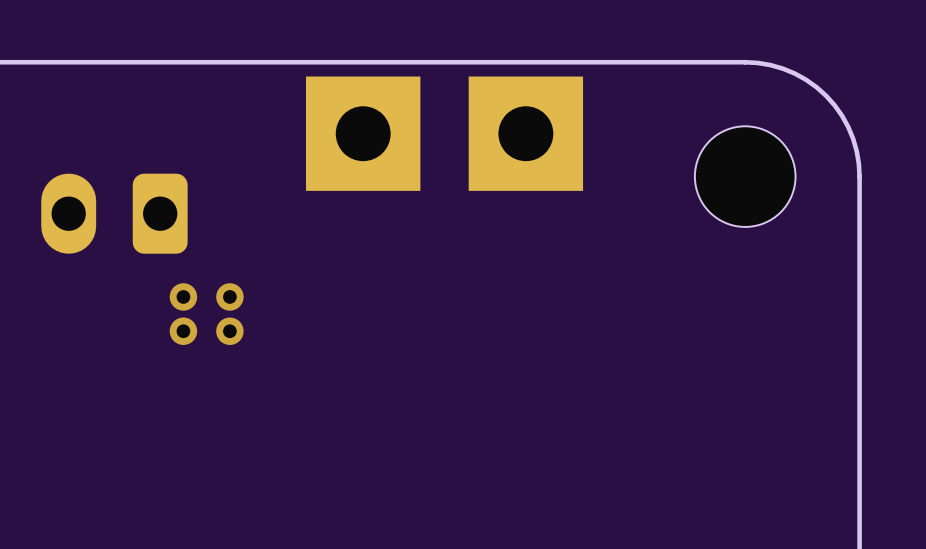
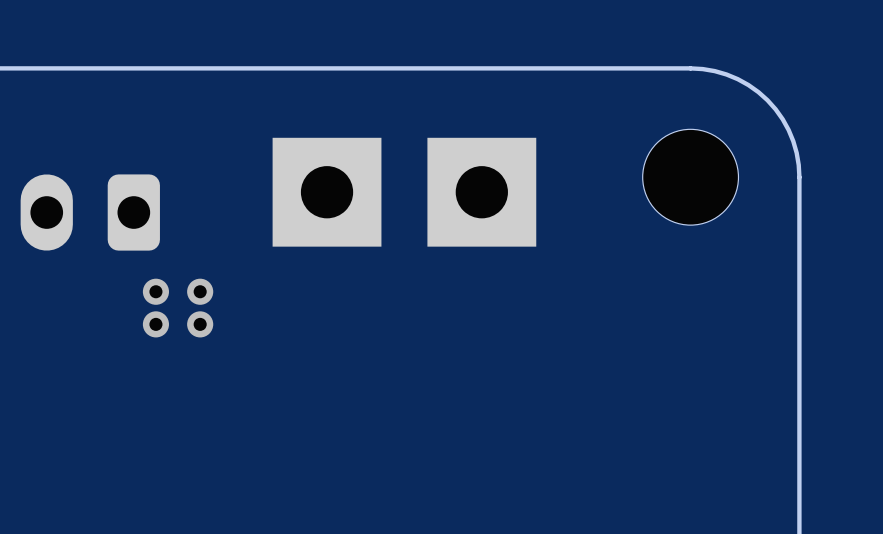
part position: (363, 133) -> (327, 192)
part position: (525, 133) -> (481, 192)

